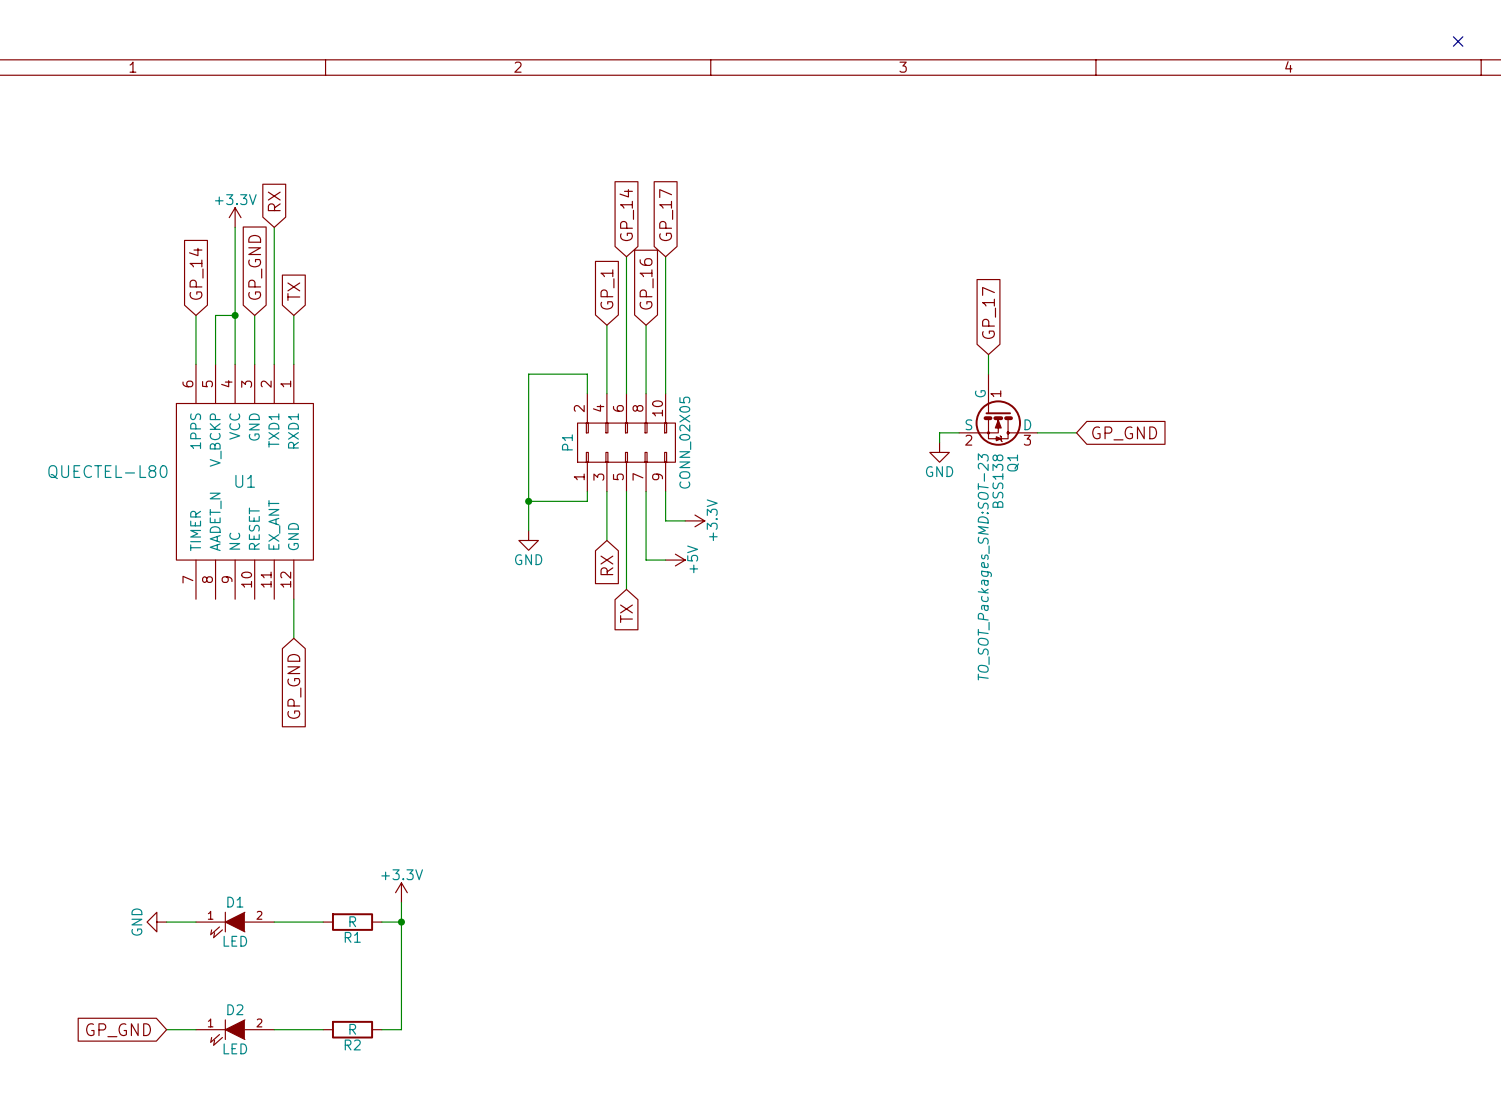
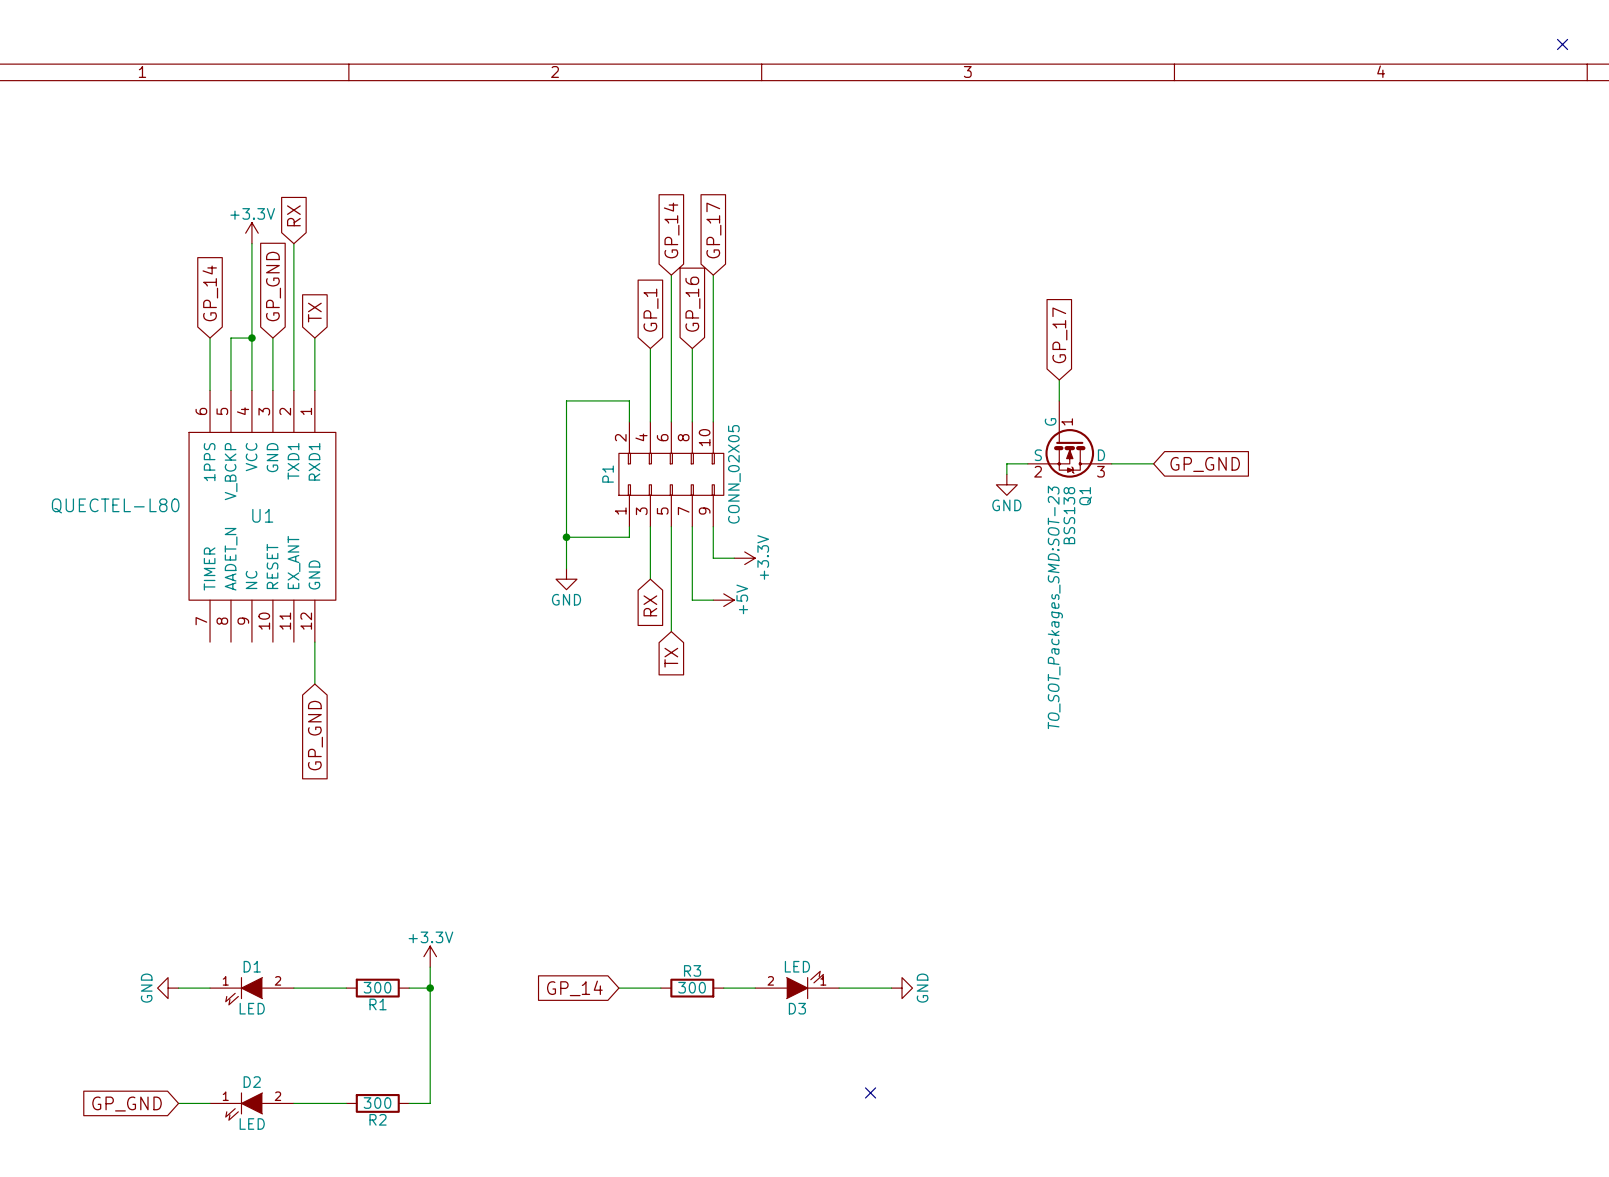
D3: none -> LED (797, 984)
R1 value: R (352, 921) -> 300 (377, 987)
global label: none -> GP_14 (574, 988)
wire: none -> (618, 988) (660, 988)
R3: none -> 300 (692, 988)
wire: none -> (723, 988) (755, 988)
wire: none -> (839, 988) (891, 988)
power symbol: none -> GND (902, 988)
no-connect mark: none -> (870, 1092)
R2 value: R (352, 1029) -> 300 (377, 1103)

